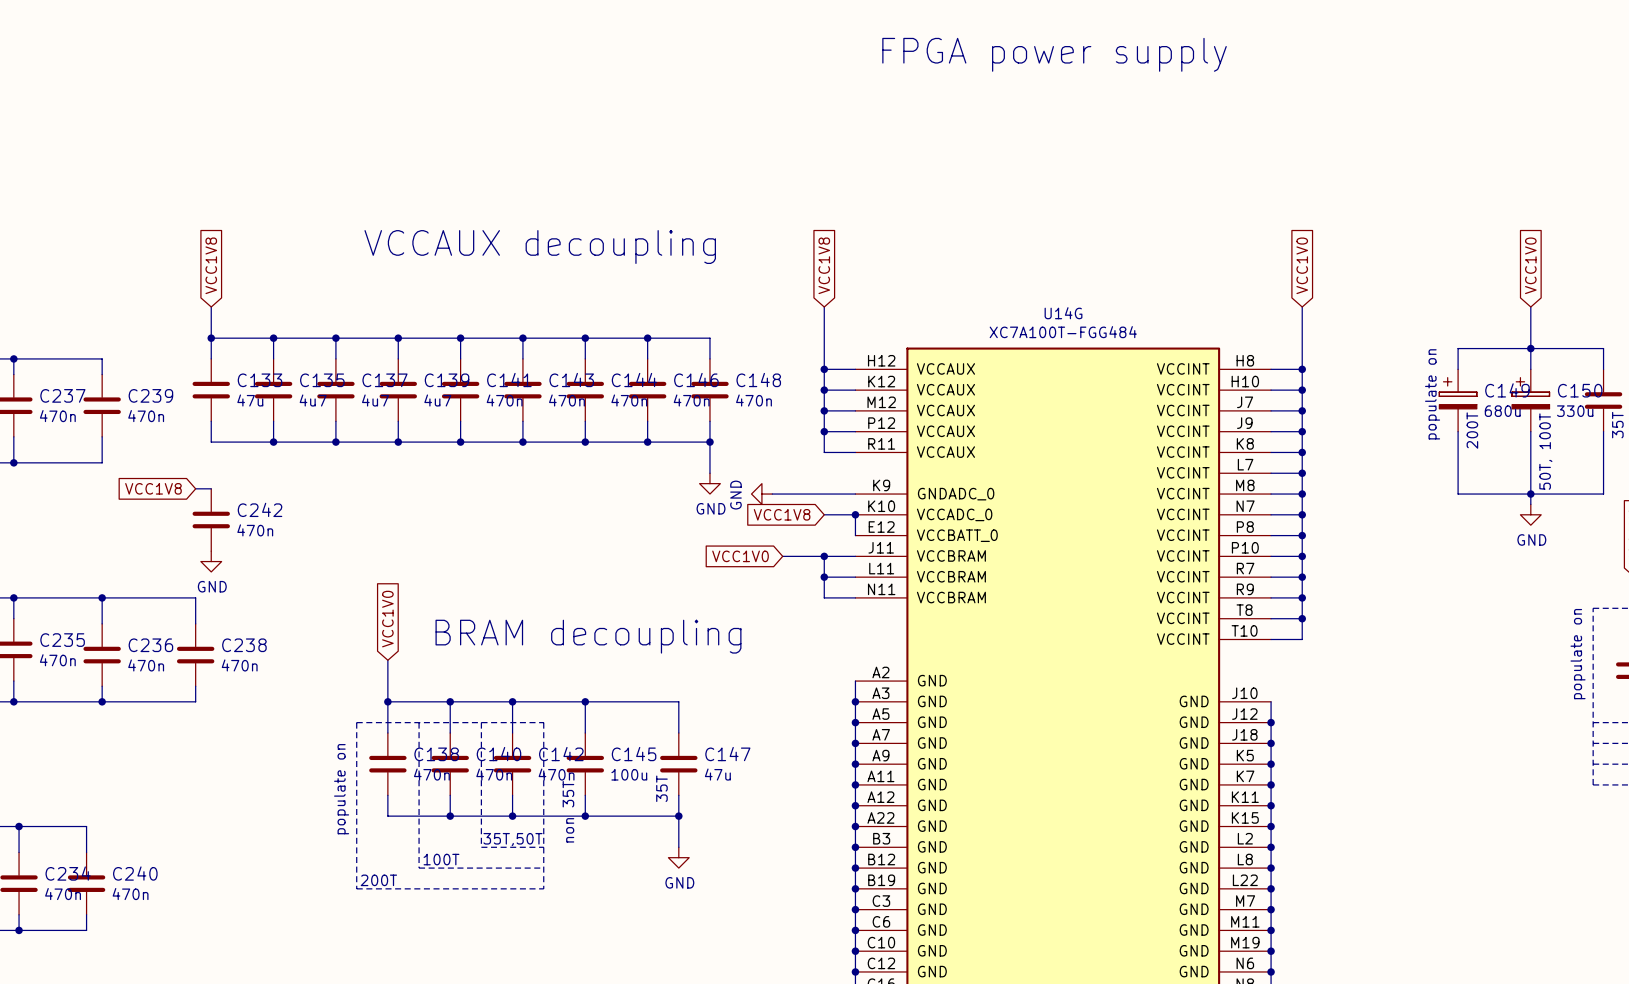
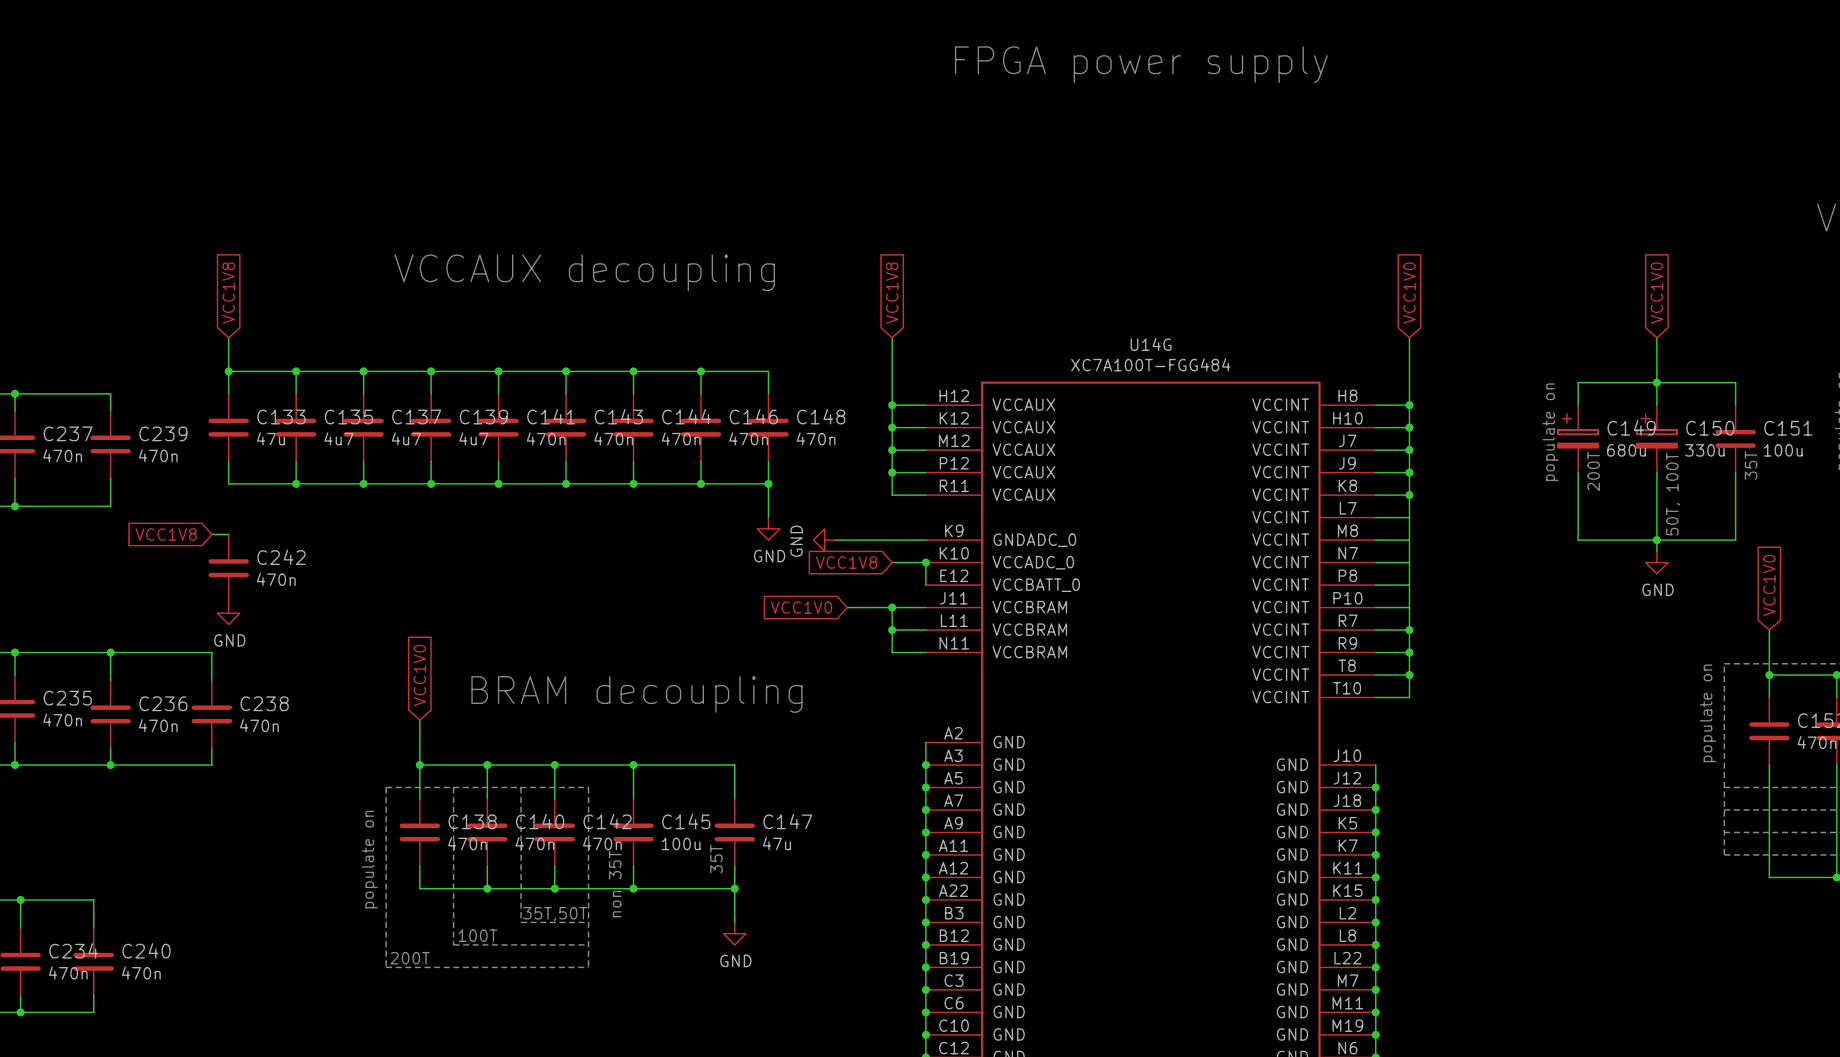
junction: (1302, 473) -> none
junction: (1302, 494) -> none
junction: (1302, 514) -> none
junction: (1302, 535) -> none
junction: (1302, 556) -> none

